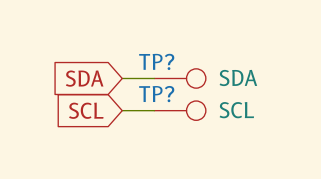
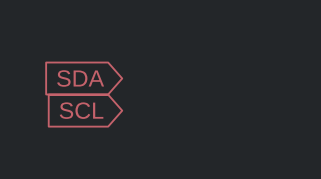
wire: (122, 78) (154, 78) -> none
TP?: SDA (180, 78) -> none
wire: (122, 110) (154, 110) -> none
TP?: SCL (180, 110) -> none

